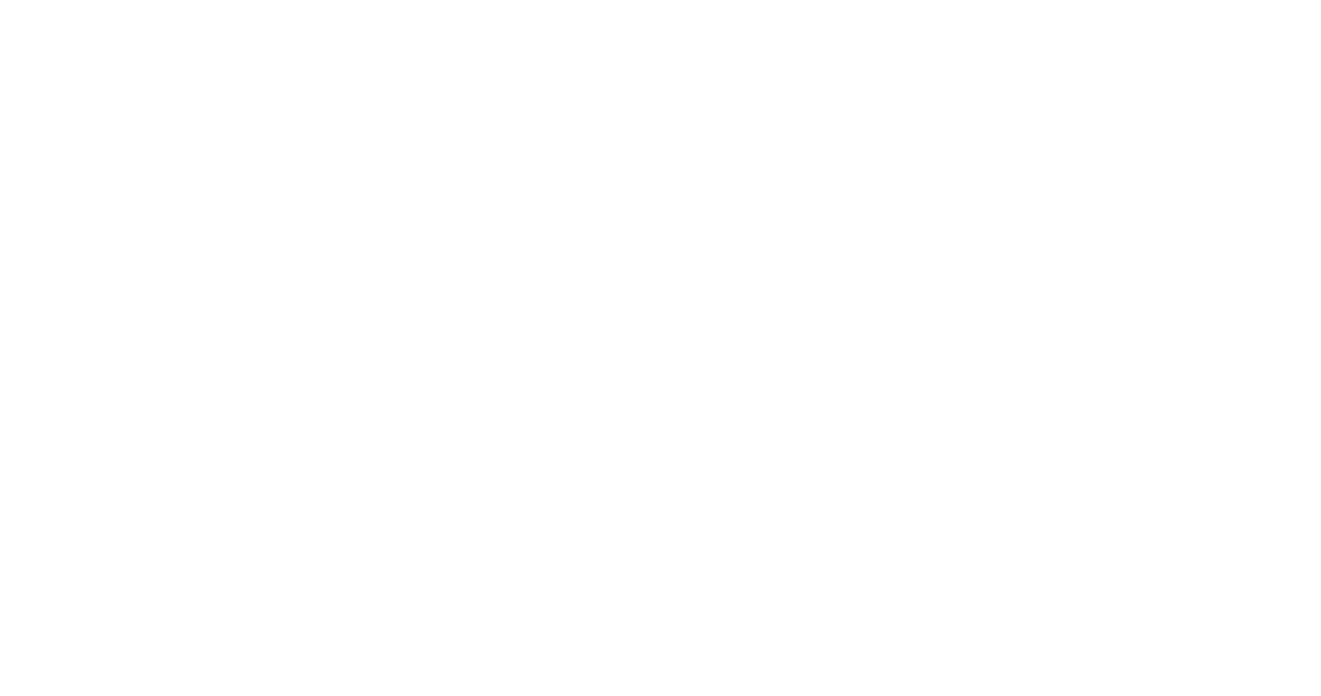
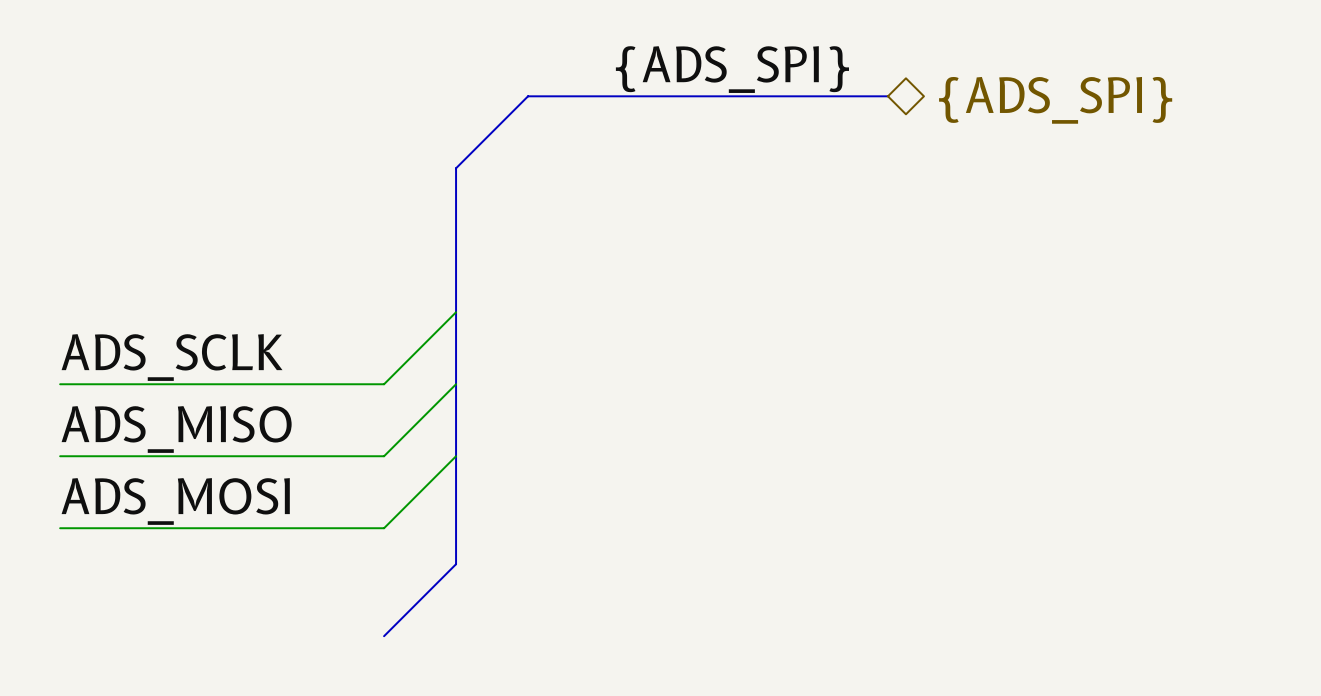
label: none -> {ADS_SPI} (732, 69)
bus: none -> (887, 96) (528, 96) (456, 168) (456, 564) (384, 636)
hierarchical label: none -> {ADS_SPI} (1055, 100)
wire: none -> (456, 312) (384, 384) (60, 384)
label: none -> ADS_SCLK (172, 357)
wire: none -> (456, 384) (384, 456) (60, 456)
label: none -> ADS_MISO (176, 429)
wire: none -> (456, 456) (384, 528) (60, 528)
label: none -> ADS_MOSI (175, 501)

